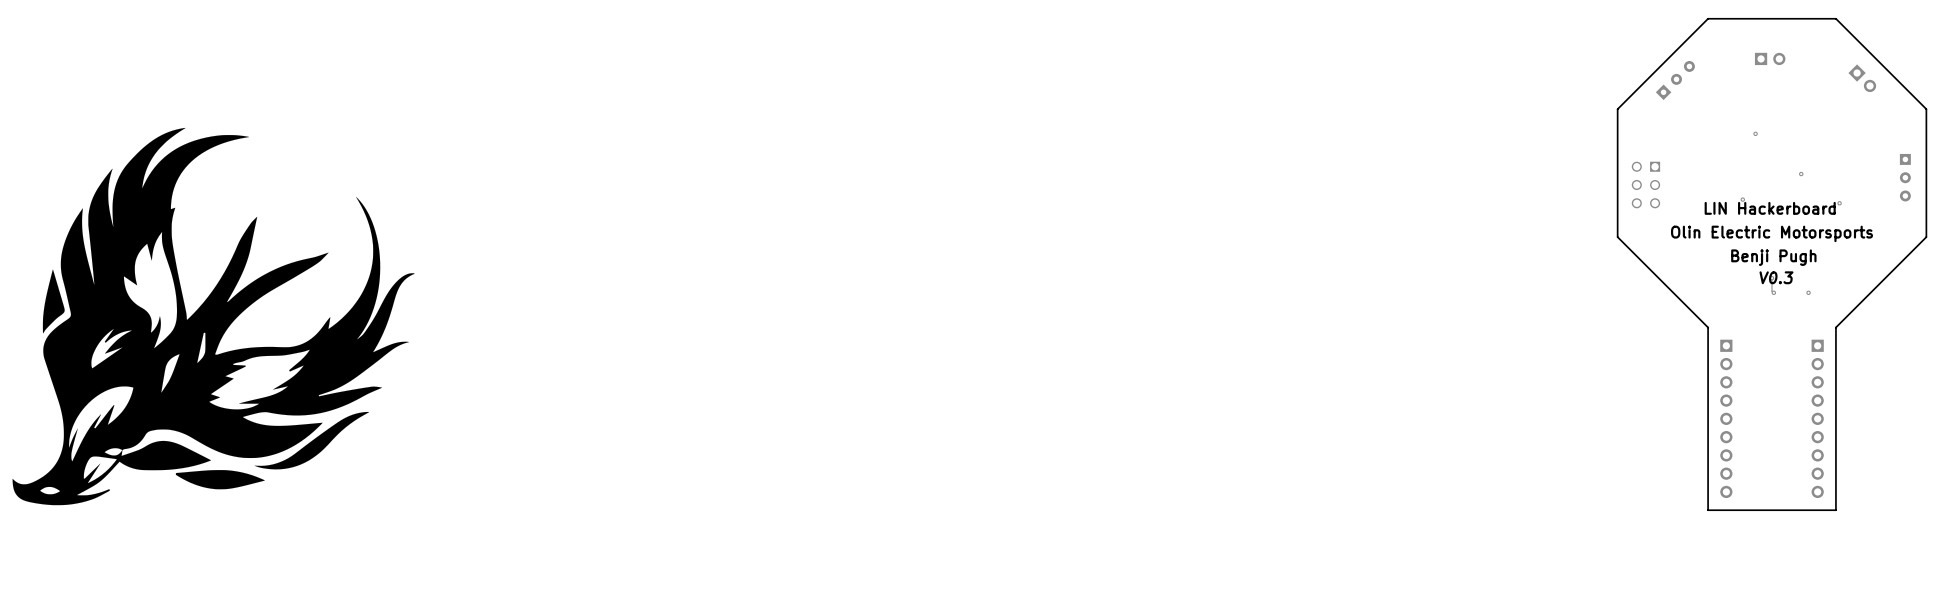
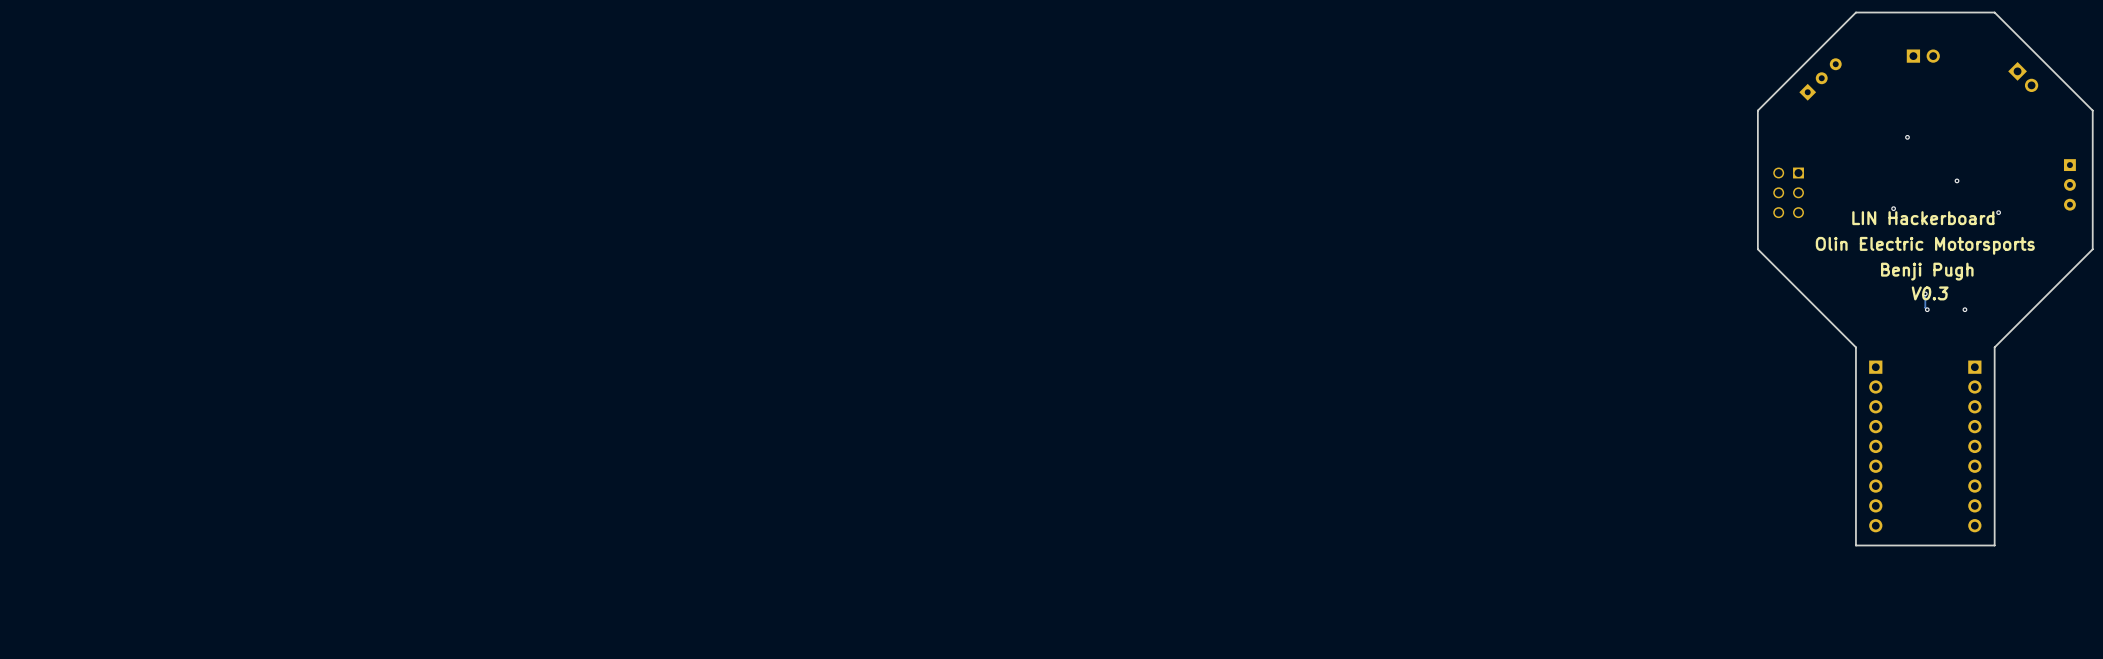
drawing: [12, 127, 415, 506] -> none

